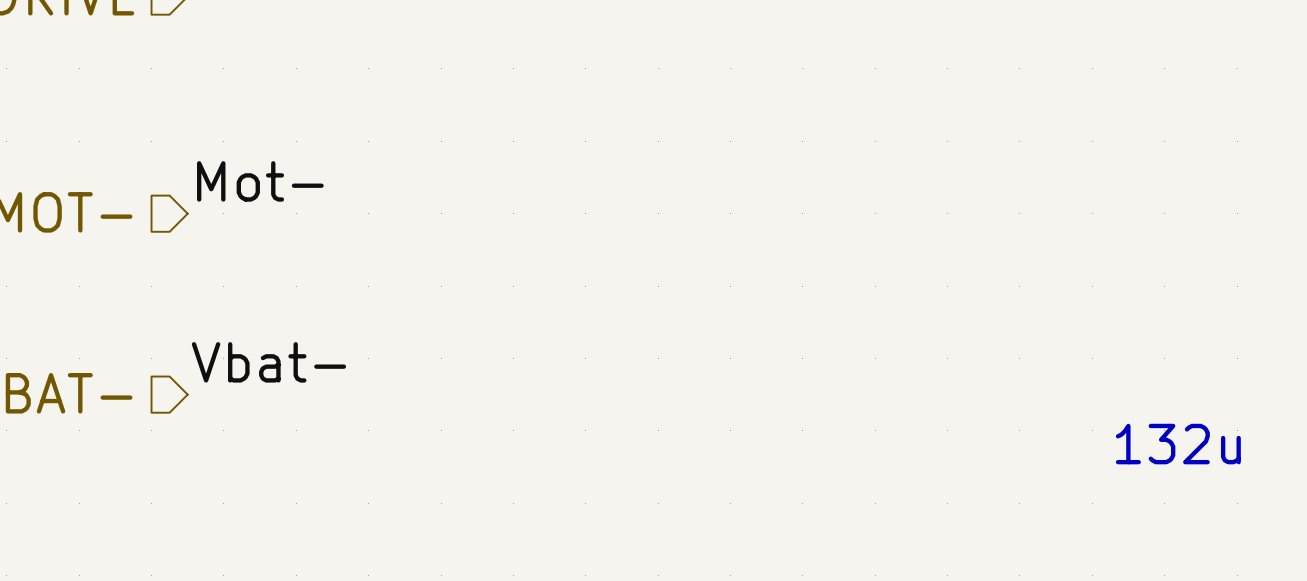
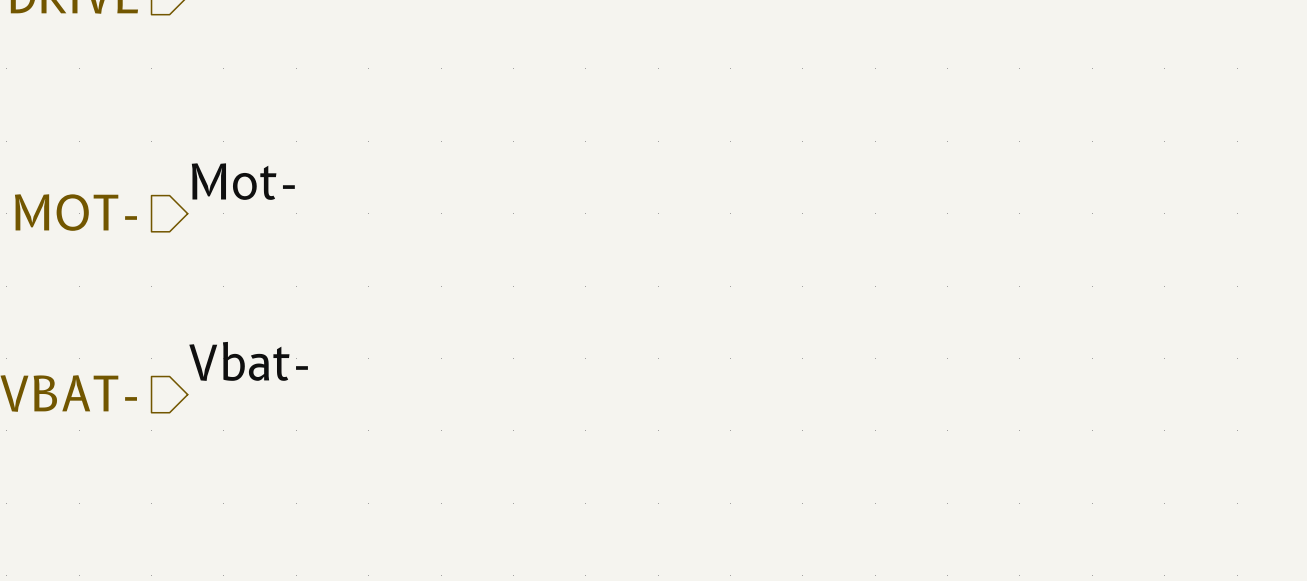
text: 132u (1178, 444) -> none

